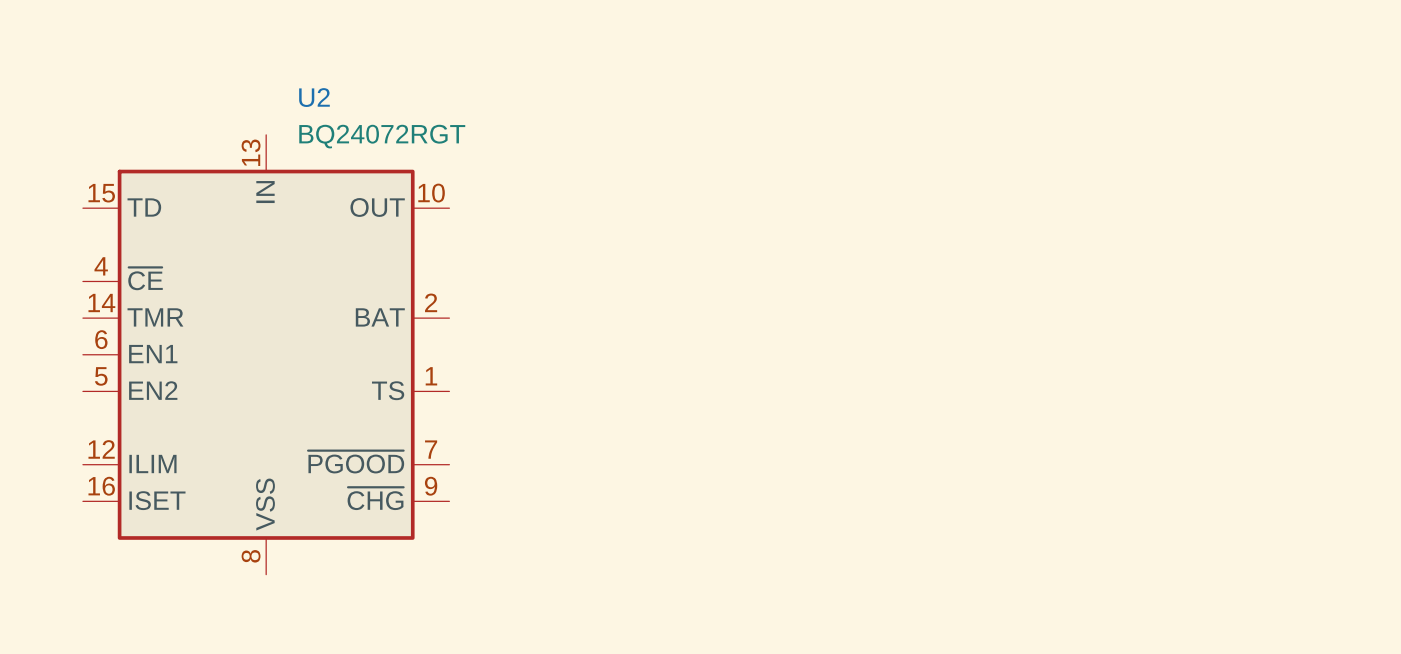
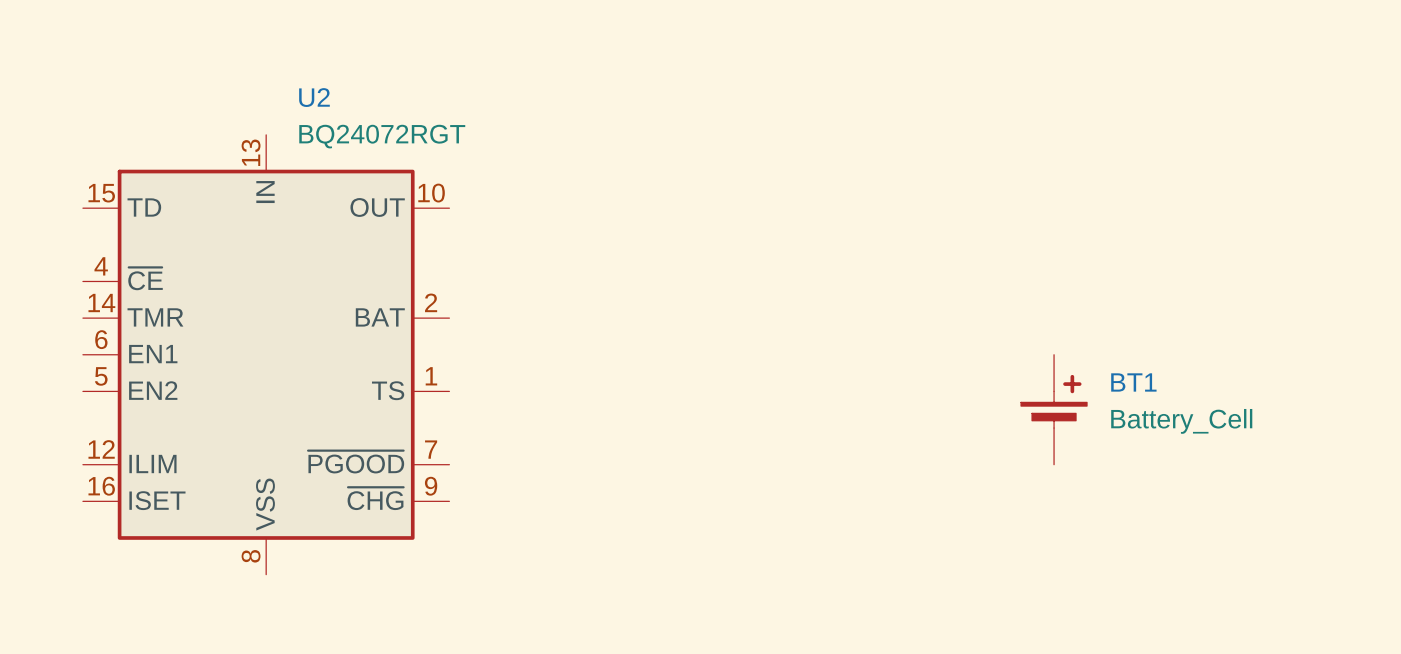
BT1: none -> Battery_Cell (1054, 409)

